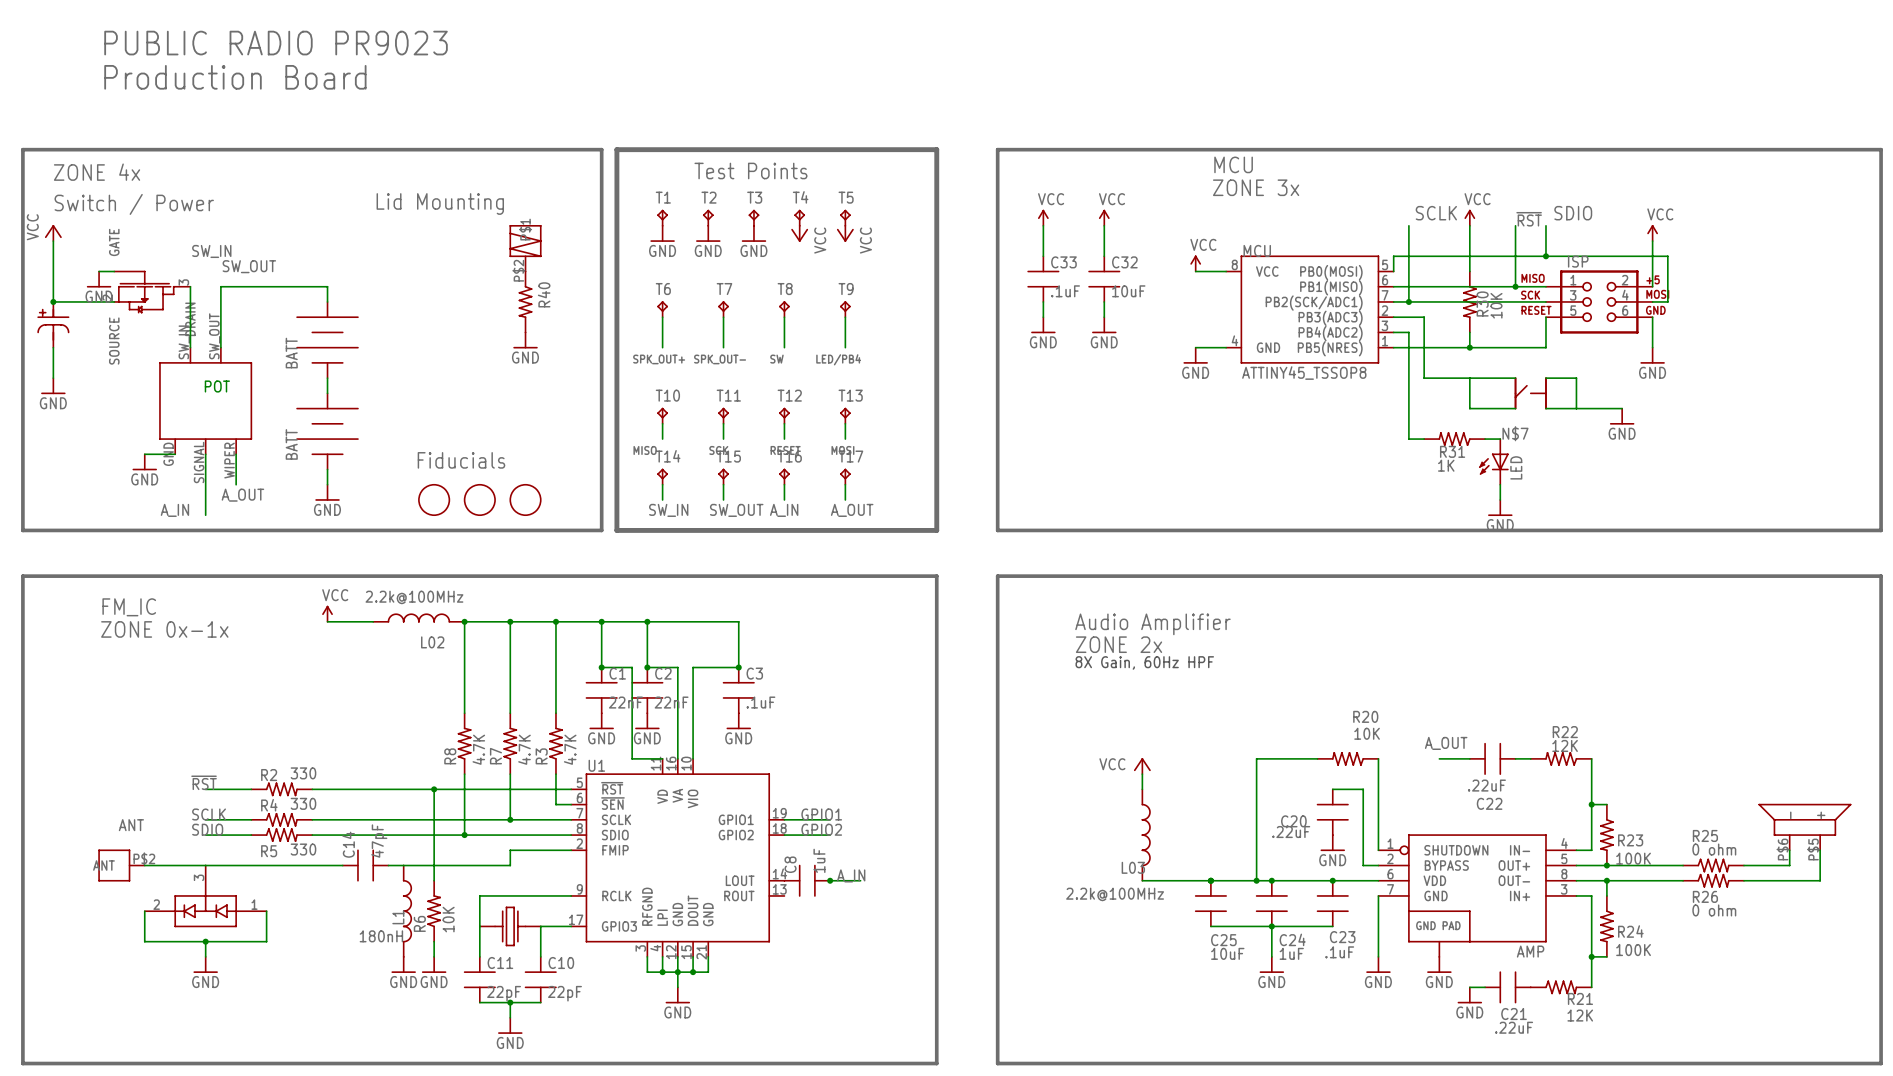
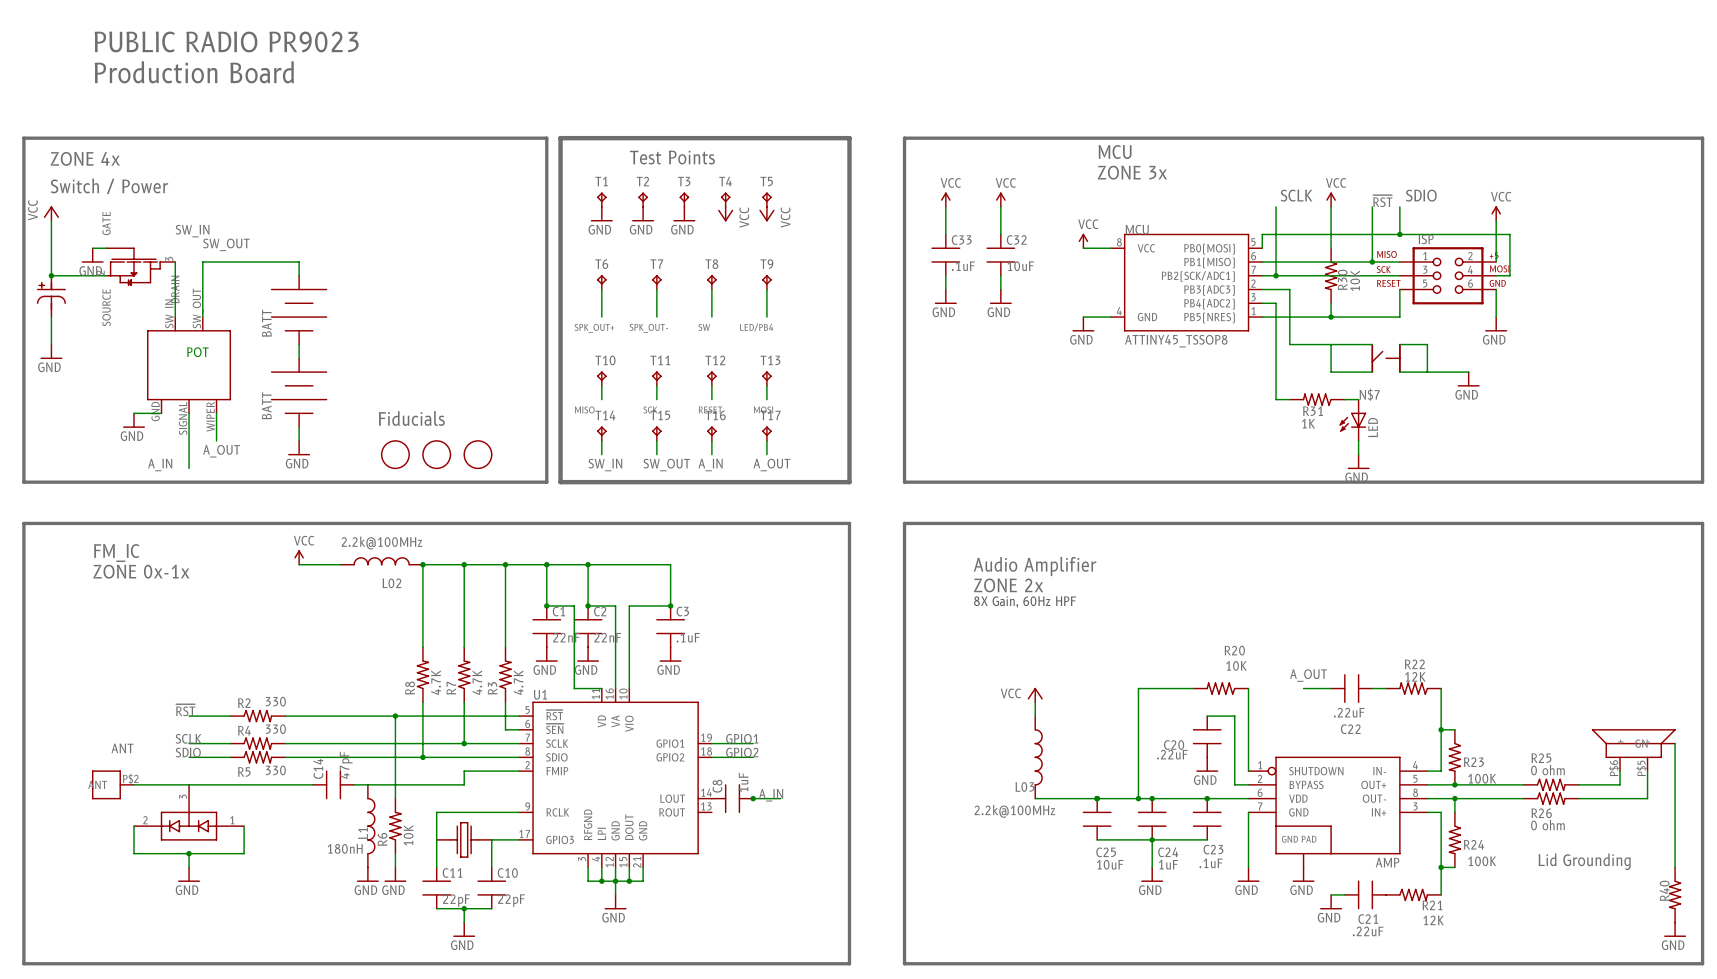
text: Lid Mounting (440, 203) -> none
part: (525, 248) -> none
R40 name position: R40 (544, 294) -> R40 (1664, 890)
R40 position: (525, 301) -> (1675, 894)
power symbol: GND (525, 340) -> none
part symbol: [1758, 803, 1852, 851] -> [1591, 729, 1676, 772]
wire: none -> (1675, 743) (1675, 867)
text: none -> Lid Grounding (1584, 861)
power symbol: none -> GND (1675, 929)

